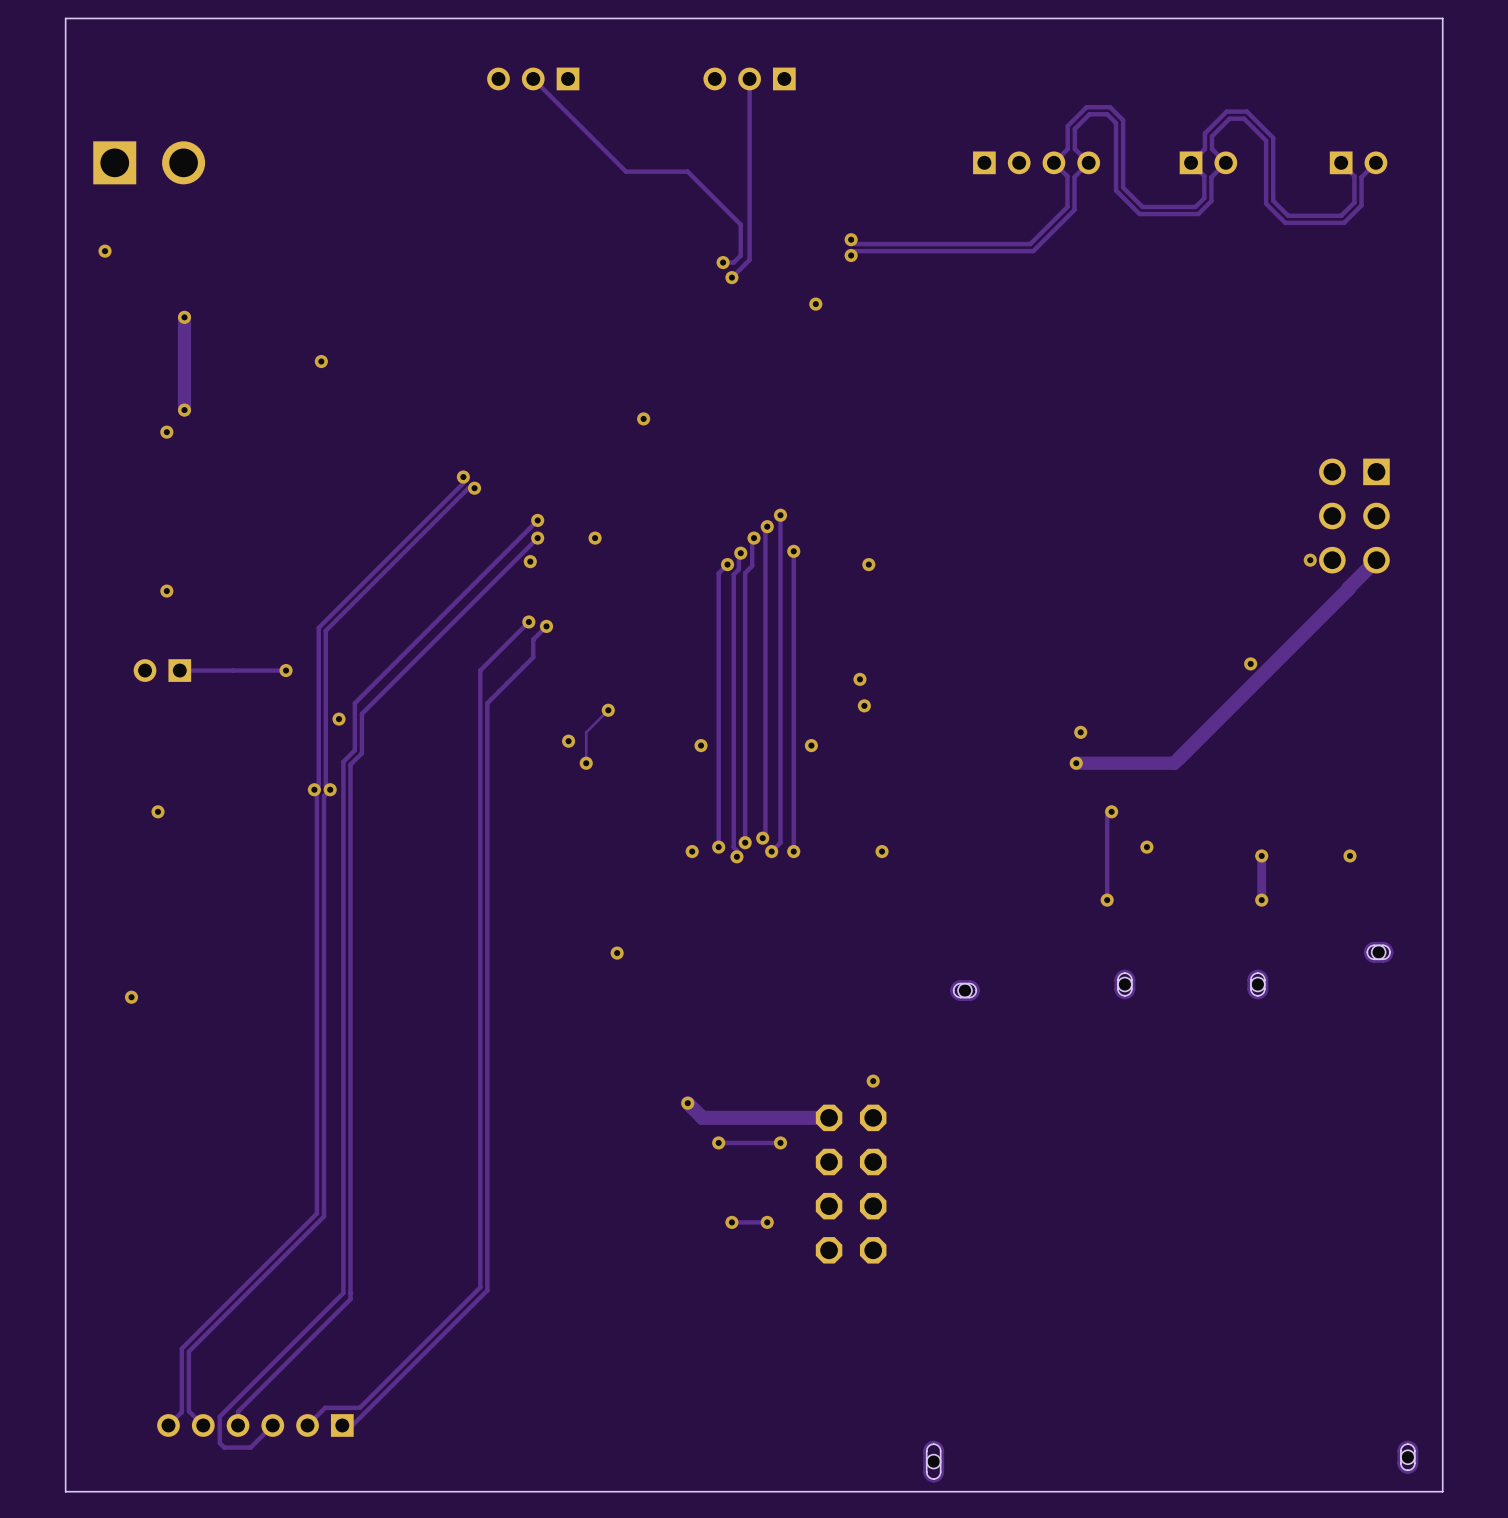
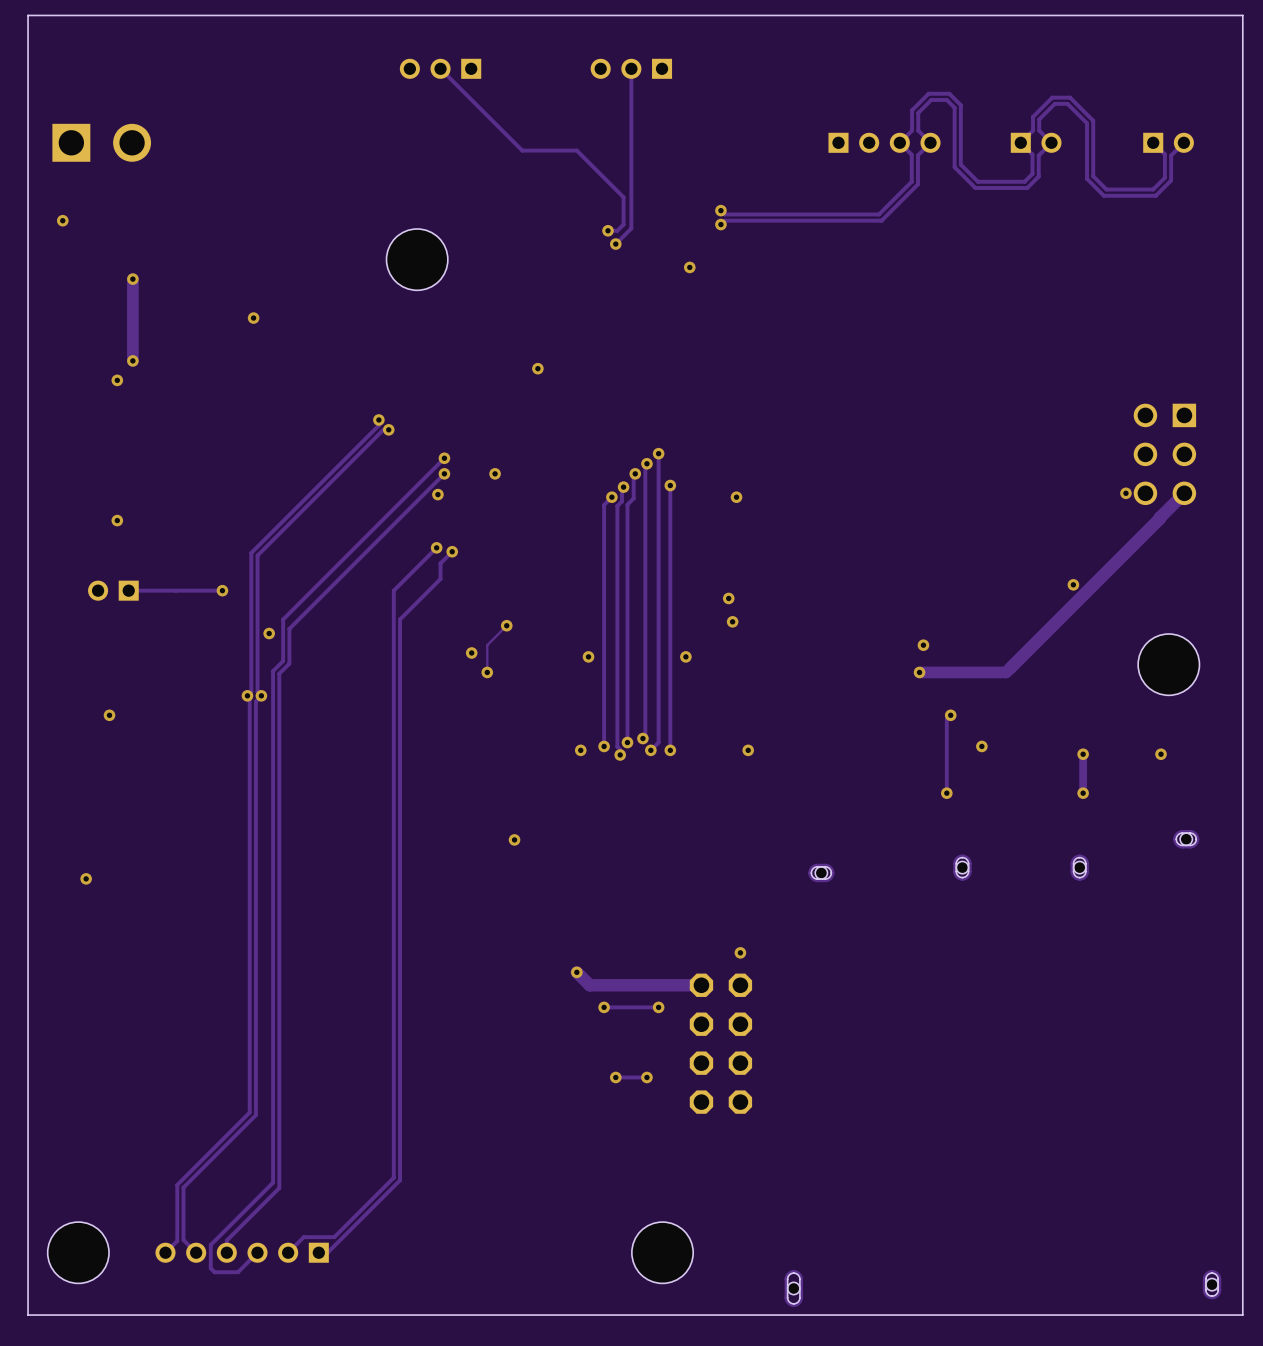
hole: none -> (417, 259)
hole: none -> (1168, 664)
track: (316, 1213) (181, 1348) (181, 1412) (168, 1425) -> (249, 1069) (249, 1112) (177, 1184) (177, 1240) (165, 1252)
track: (324, 1216) (188, 1351) (188, 1411) (203, 1425) -> (255, 1072) (255, 1115) (183, 1187) (183, 1240) (196, 1252)
track: (480, 1287) (359, 1407) (325, 1407) (307, 1425) -> (393, 1134) (393, 1177) (334, 1237) (303, 1237) (288, 1252)
track: (487, 1290) (352, 1425) (342, 1425) -> (400, 1137) (400, 1180) (327, 1252) (318, 1252)
track: (343, 1293) (219, 1416) (219, 1443) (224, 1447) (250, 1447) (272, 1425) -> (273, 1139) (273, 1182) (210, 1244) (210, 1268) (214, 1272) (238, 1272) (257, 1252)
track: (350, 1299) (238, 1411) (238, 1425) -> (279, 1145) (279, 1188) (226, 1240) (226, 1252)
hole: none -> (78, 1252)
hole: none -> (662, 1252)
part position: (255, 1425) -> (242, 1252)

